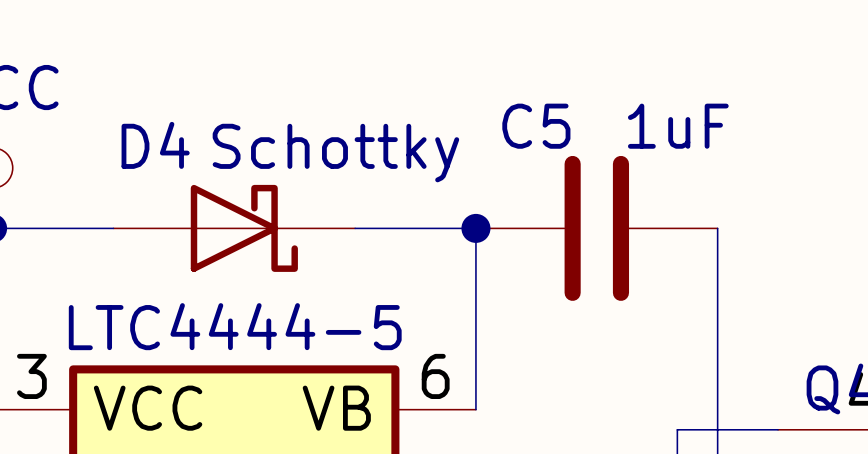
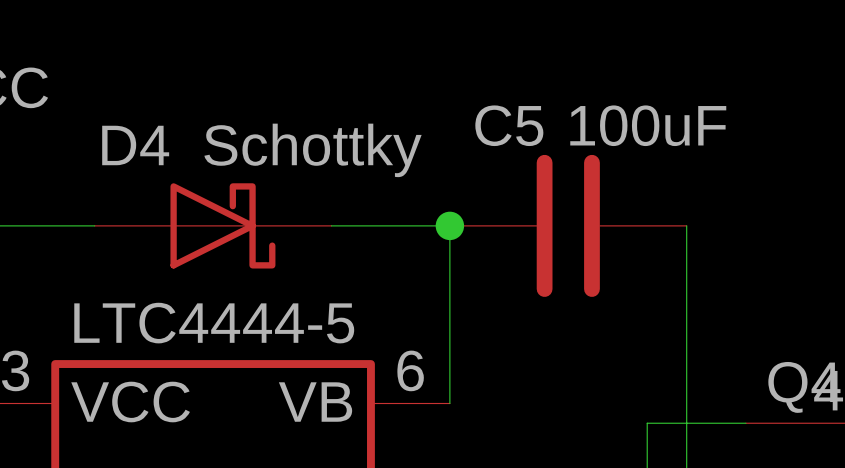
C5 value: 1uF (678, 126) -> 100uF (648, 125)

